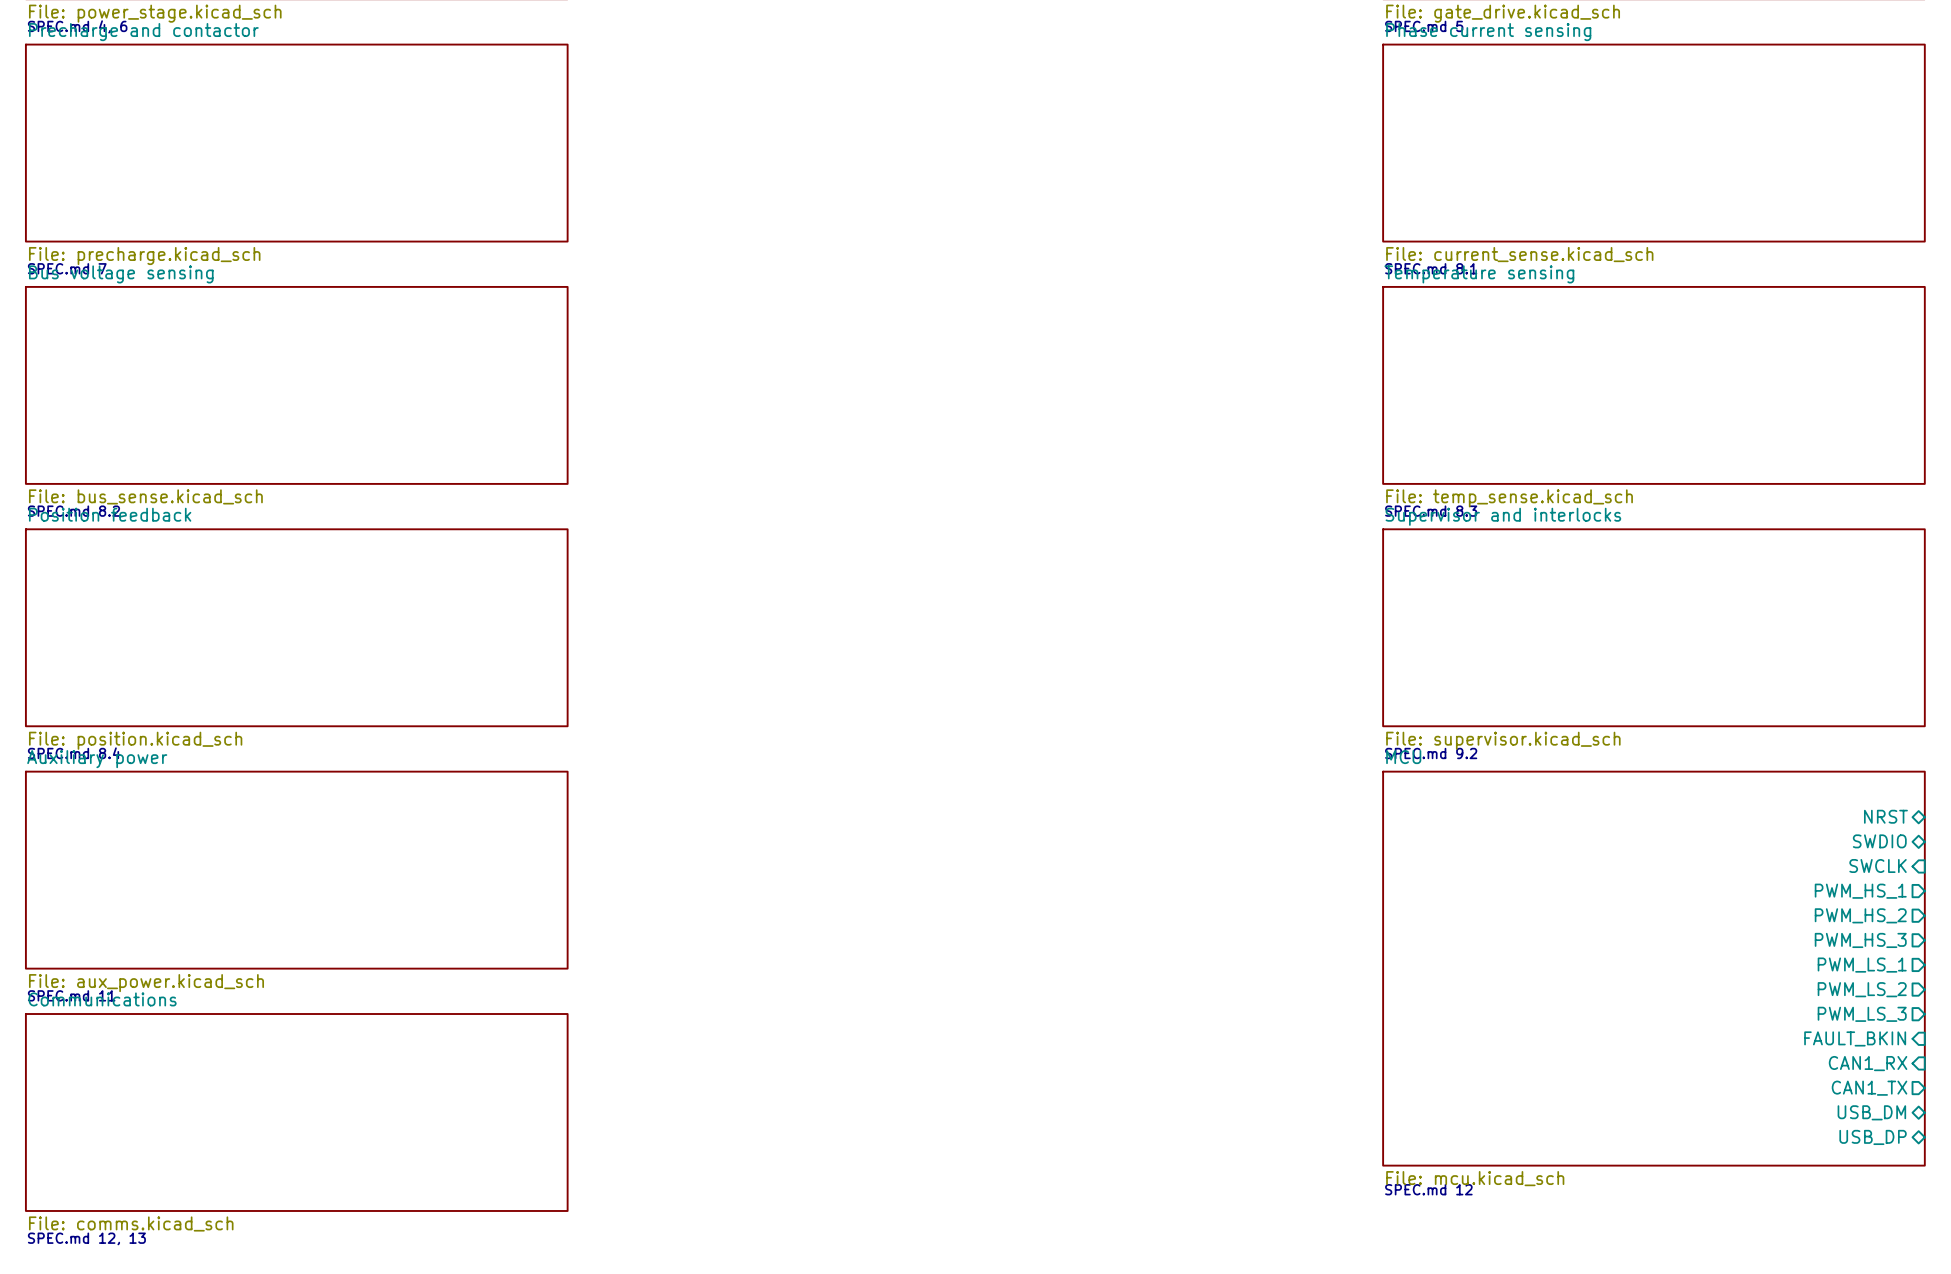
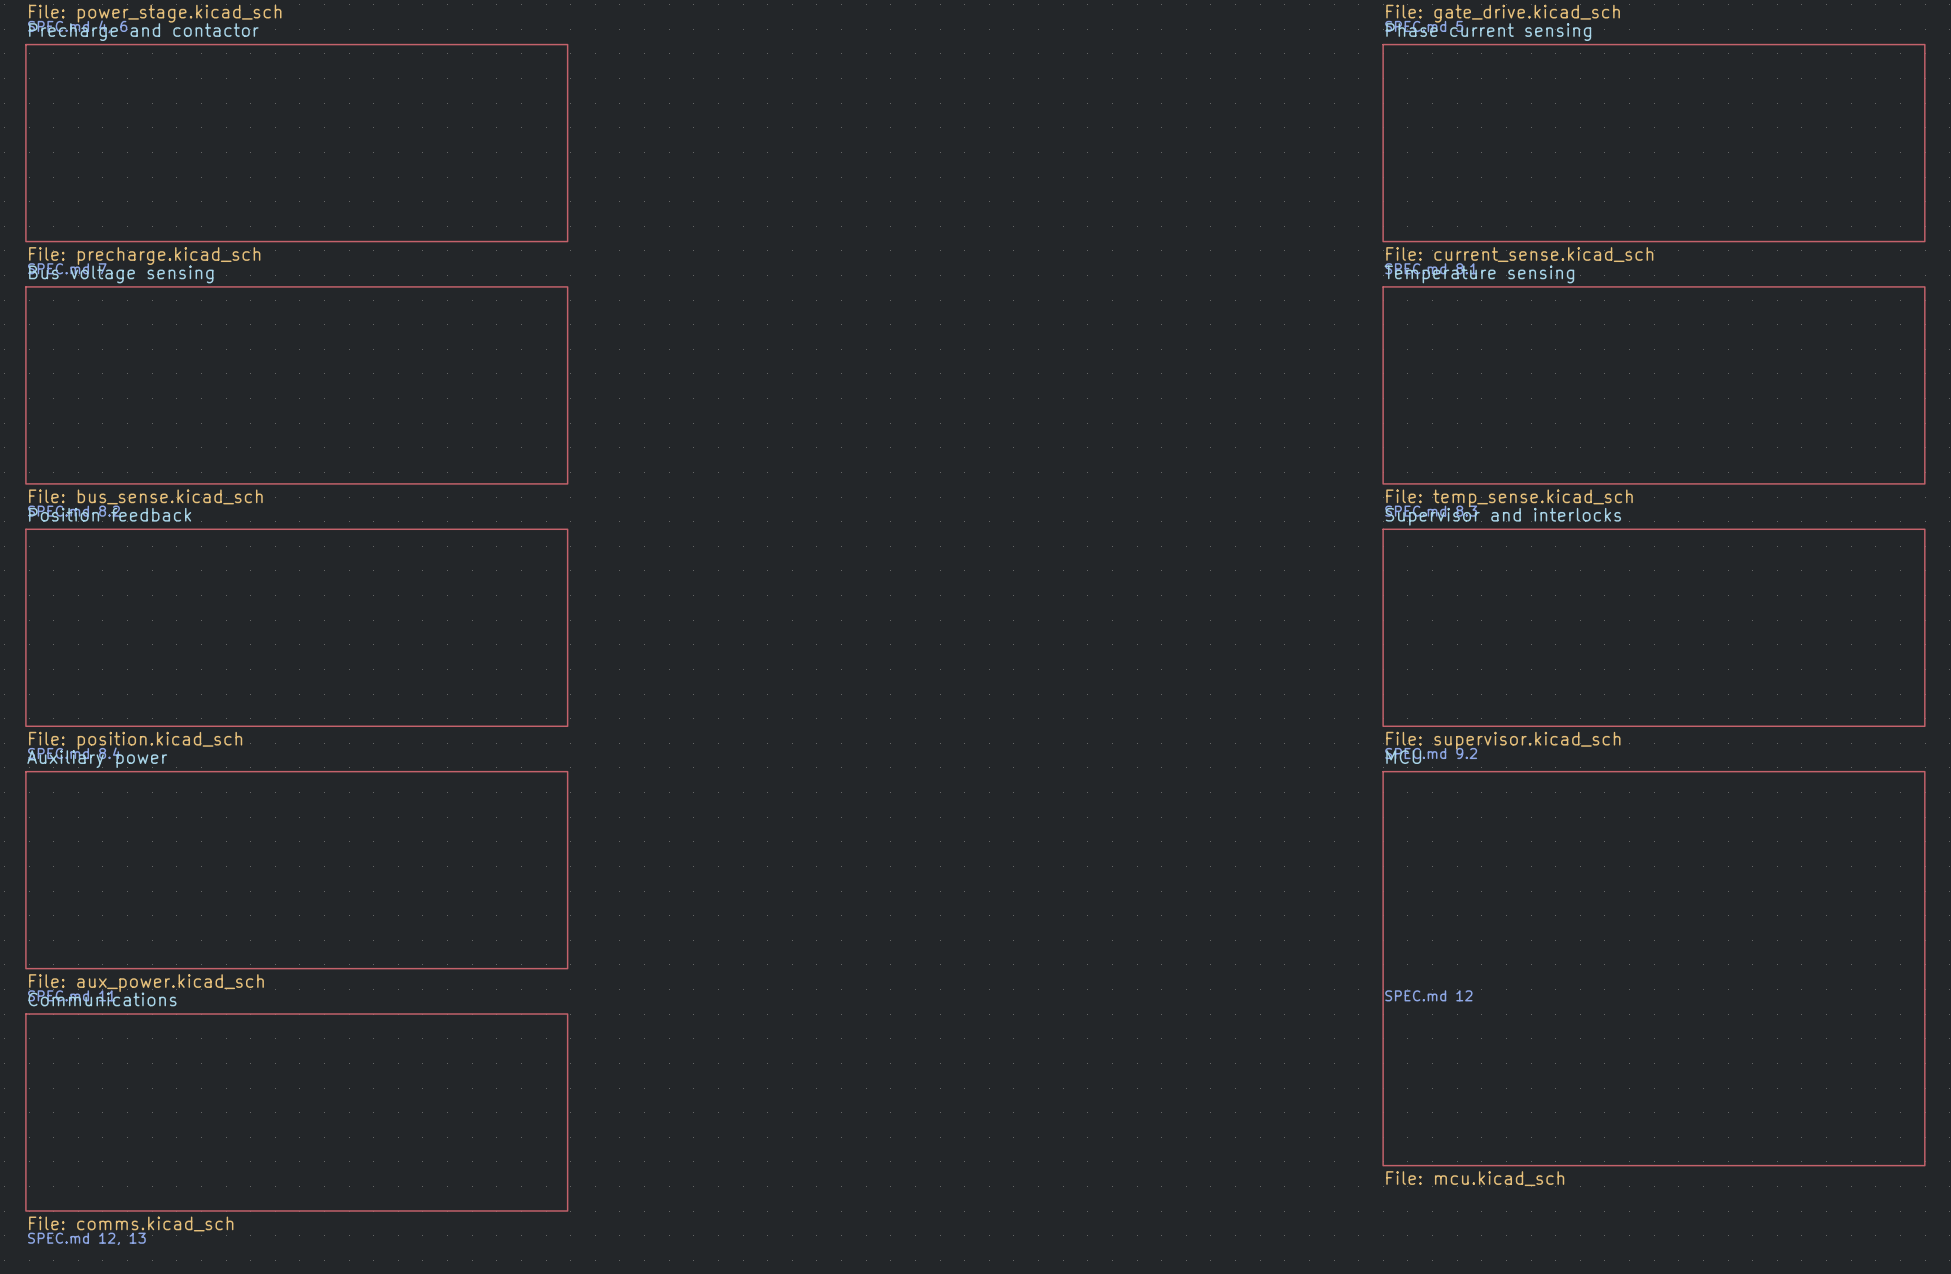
sheet pin: NRST (1885, 816) -> none
sheet pin: SWDIO (1879, 841) -> none
sheet pin: SWCLK (1878, 865) -> none
sheet pin: PWM_HS_1 (1860, 891) -> none
sheet pin: PWM_HS_2 (1860, 915) -> none
sheet pin: PWM_HS_3 (1860, 940) -> none
sheet pin: PWM_LS_1 (1862, 965) -> none
sheet pin: PWM_LS_2 (1862, 989) -> none
sheet pin: PWM_LS_3 (1862, 1014) -> none
sheet pin: FAULT_BKIN (1855, 1038) -> none
sheet pin: CAN1_RX (1868, 1063) -> none
sheet pin: CAN1_TX (1869, 1088) -> none
sheet pin: USB_DM (1871, 1112) -> none
sheet pin: USB_DP (1873, 1137) -> none
text position: SPEC.md 12 (1428, 1189) -> SPEC.md 12 (1428, 995)

